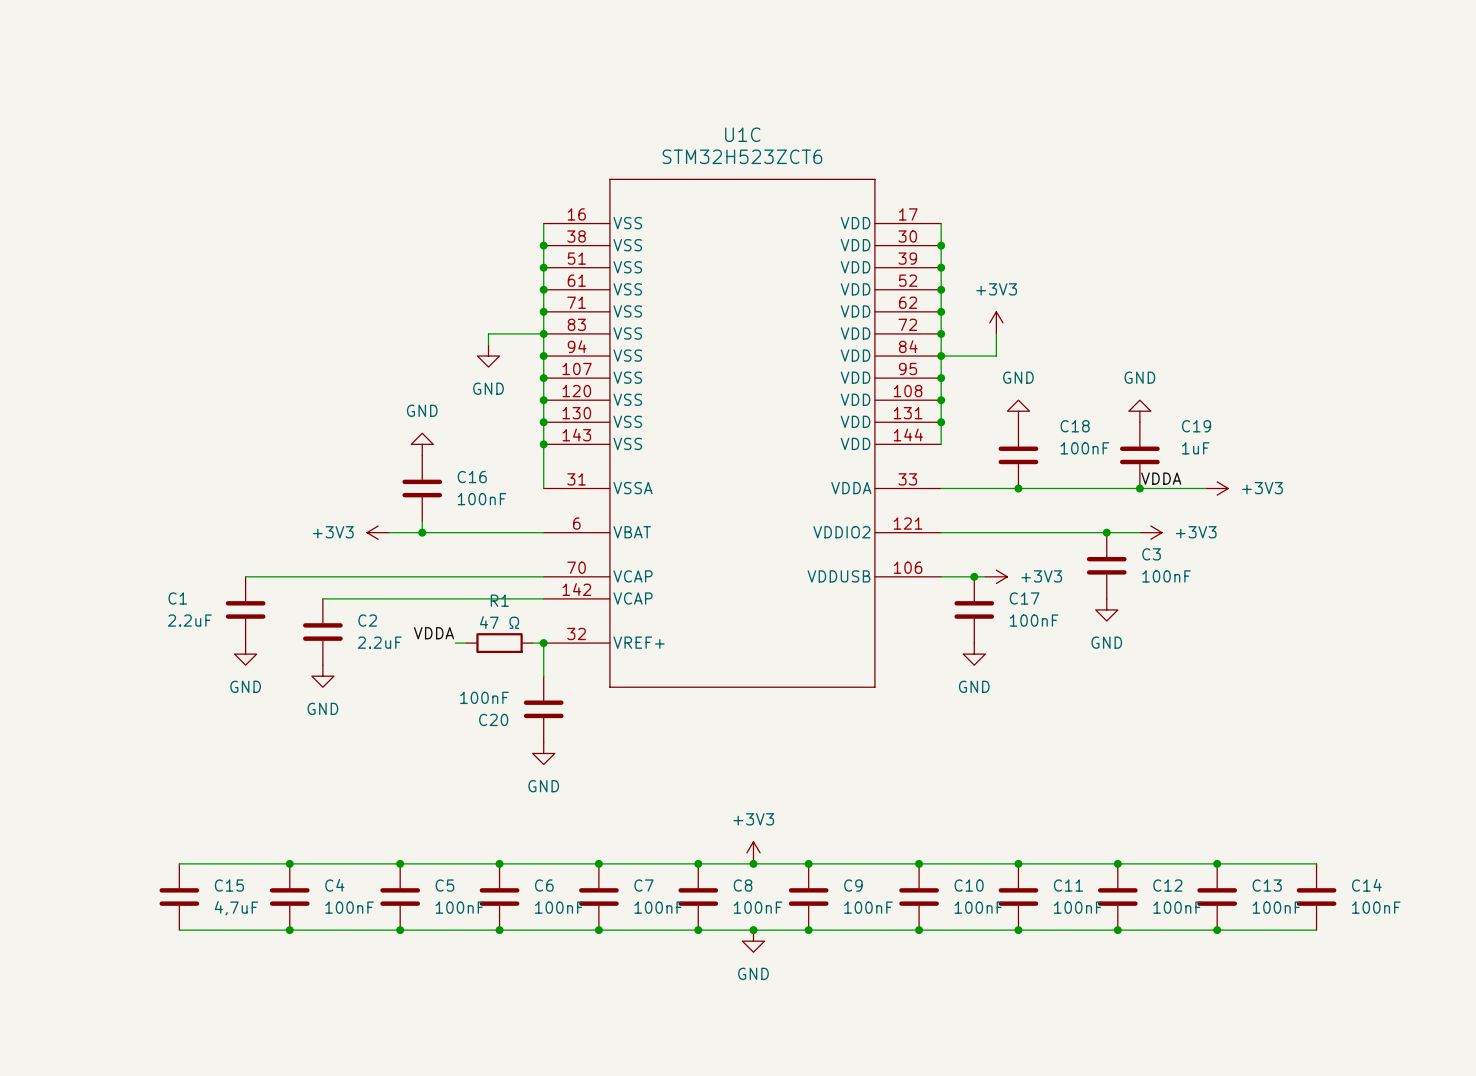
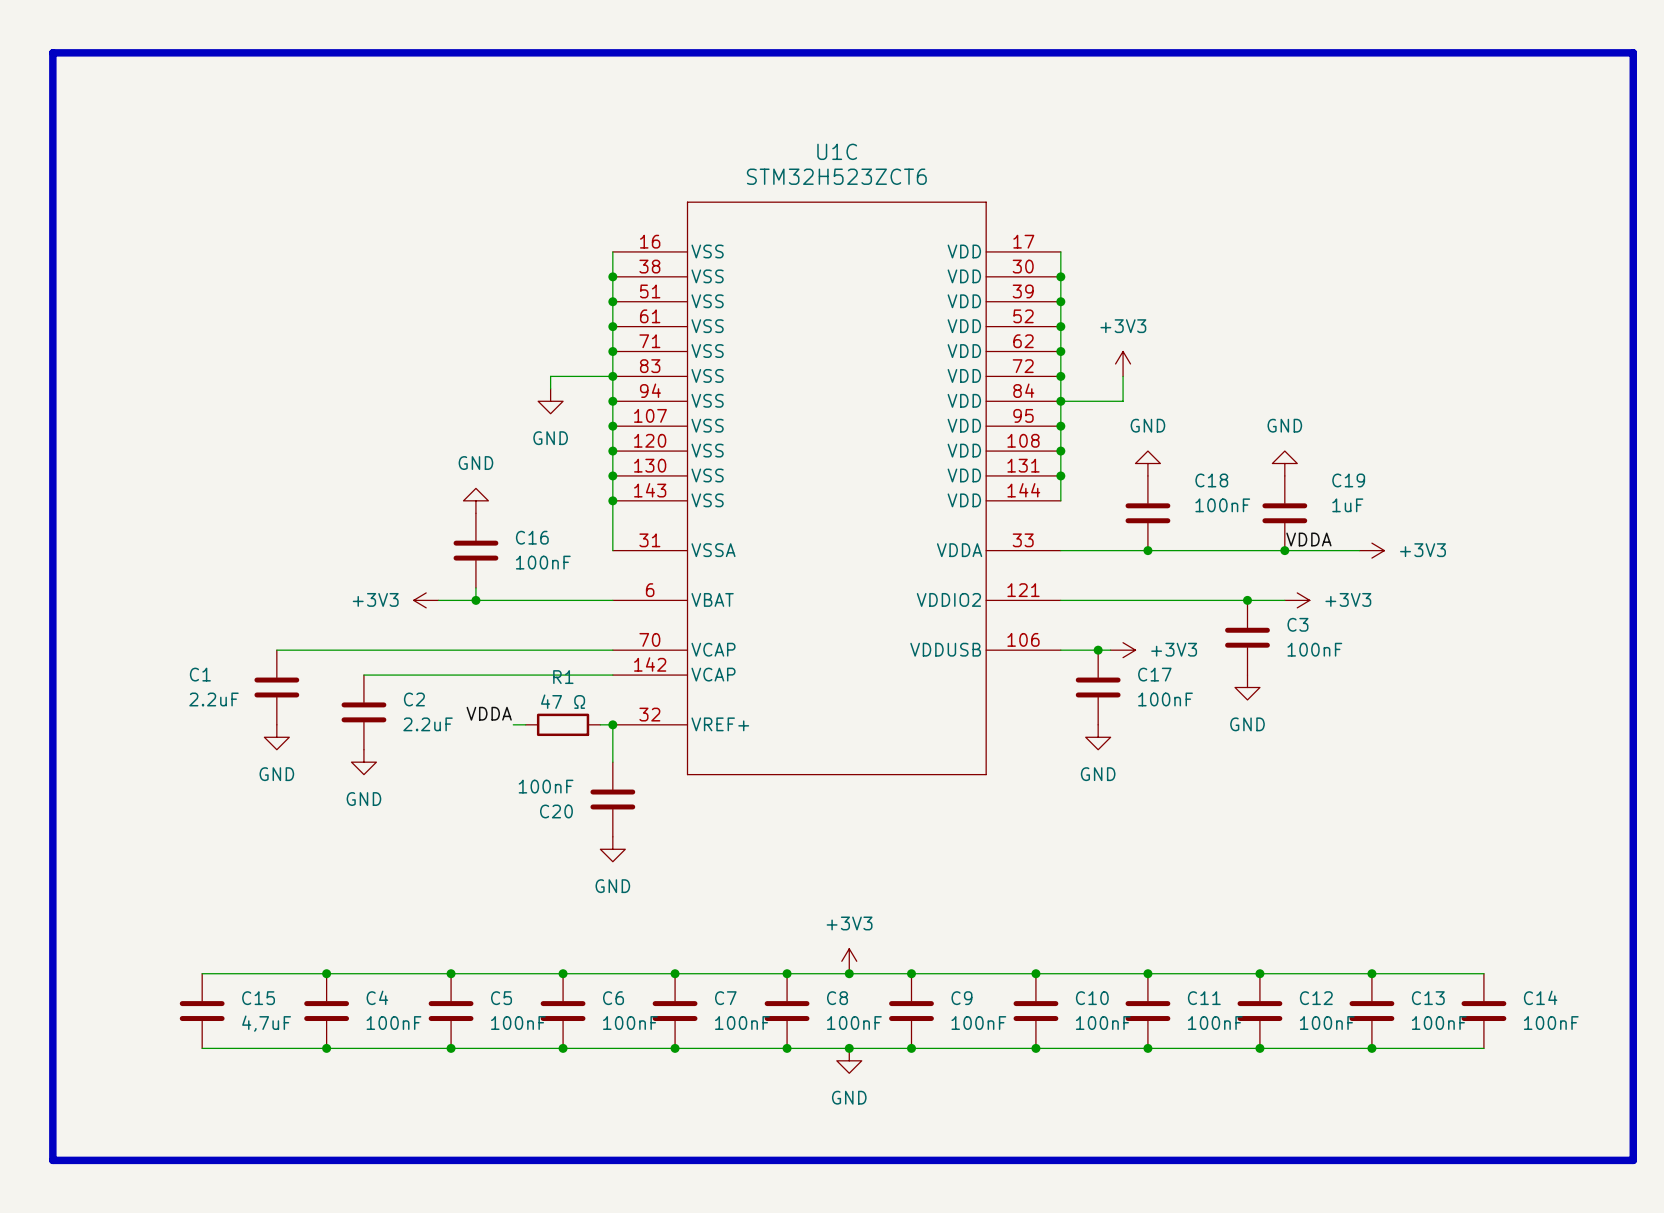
line: none -> (52, 52) (1633, 52) (1633, 1160) (52, 1160) (52, 52)

